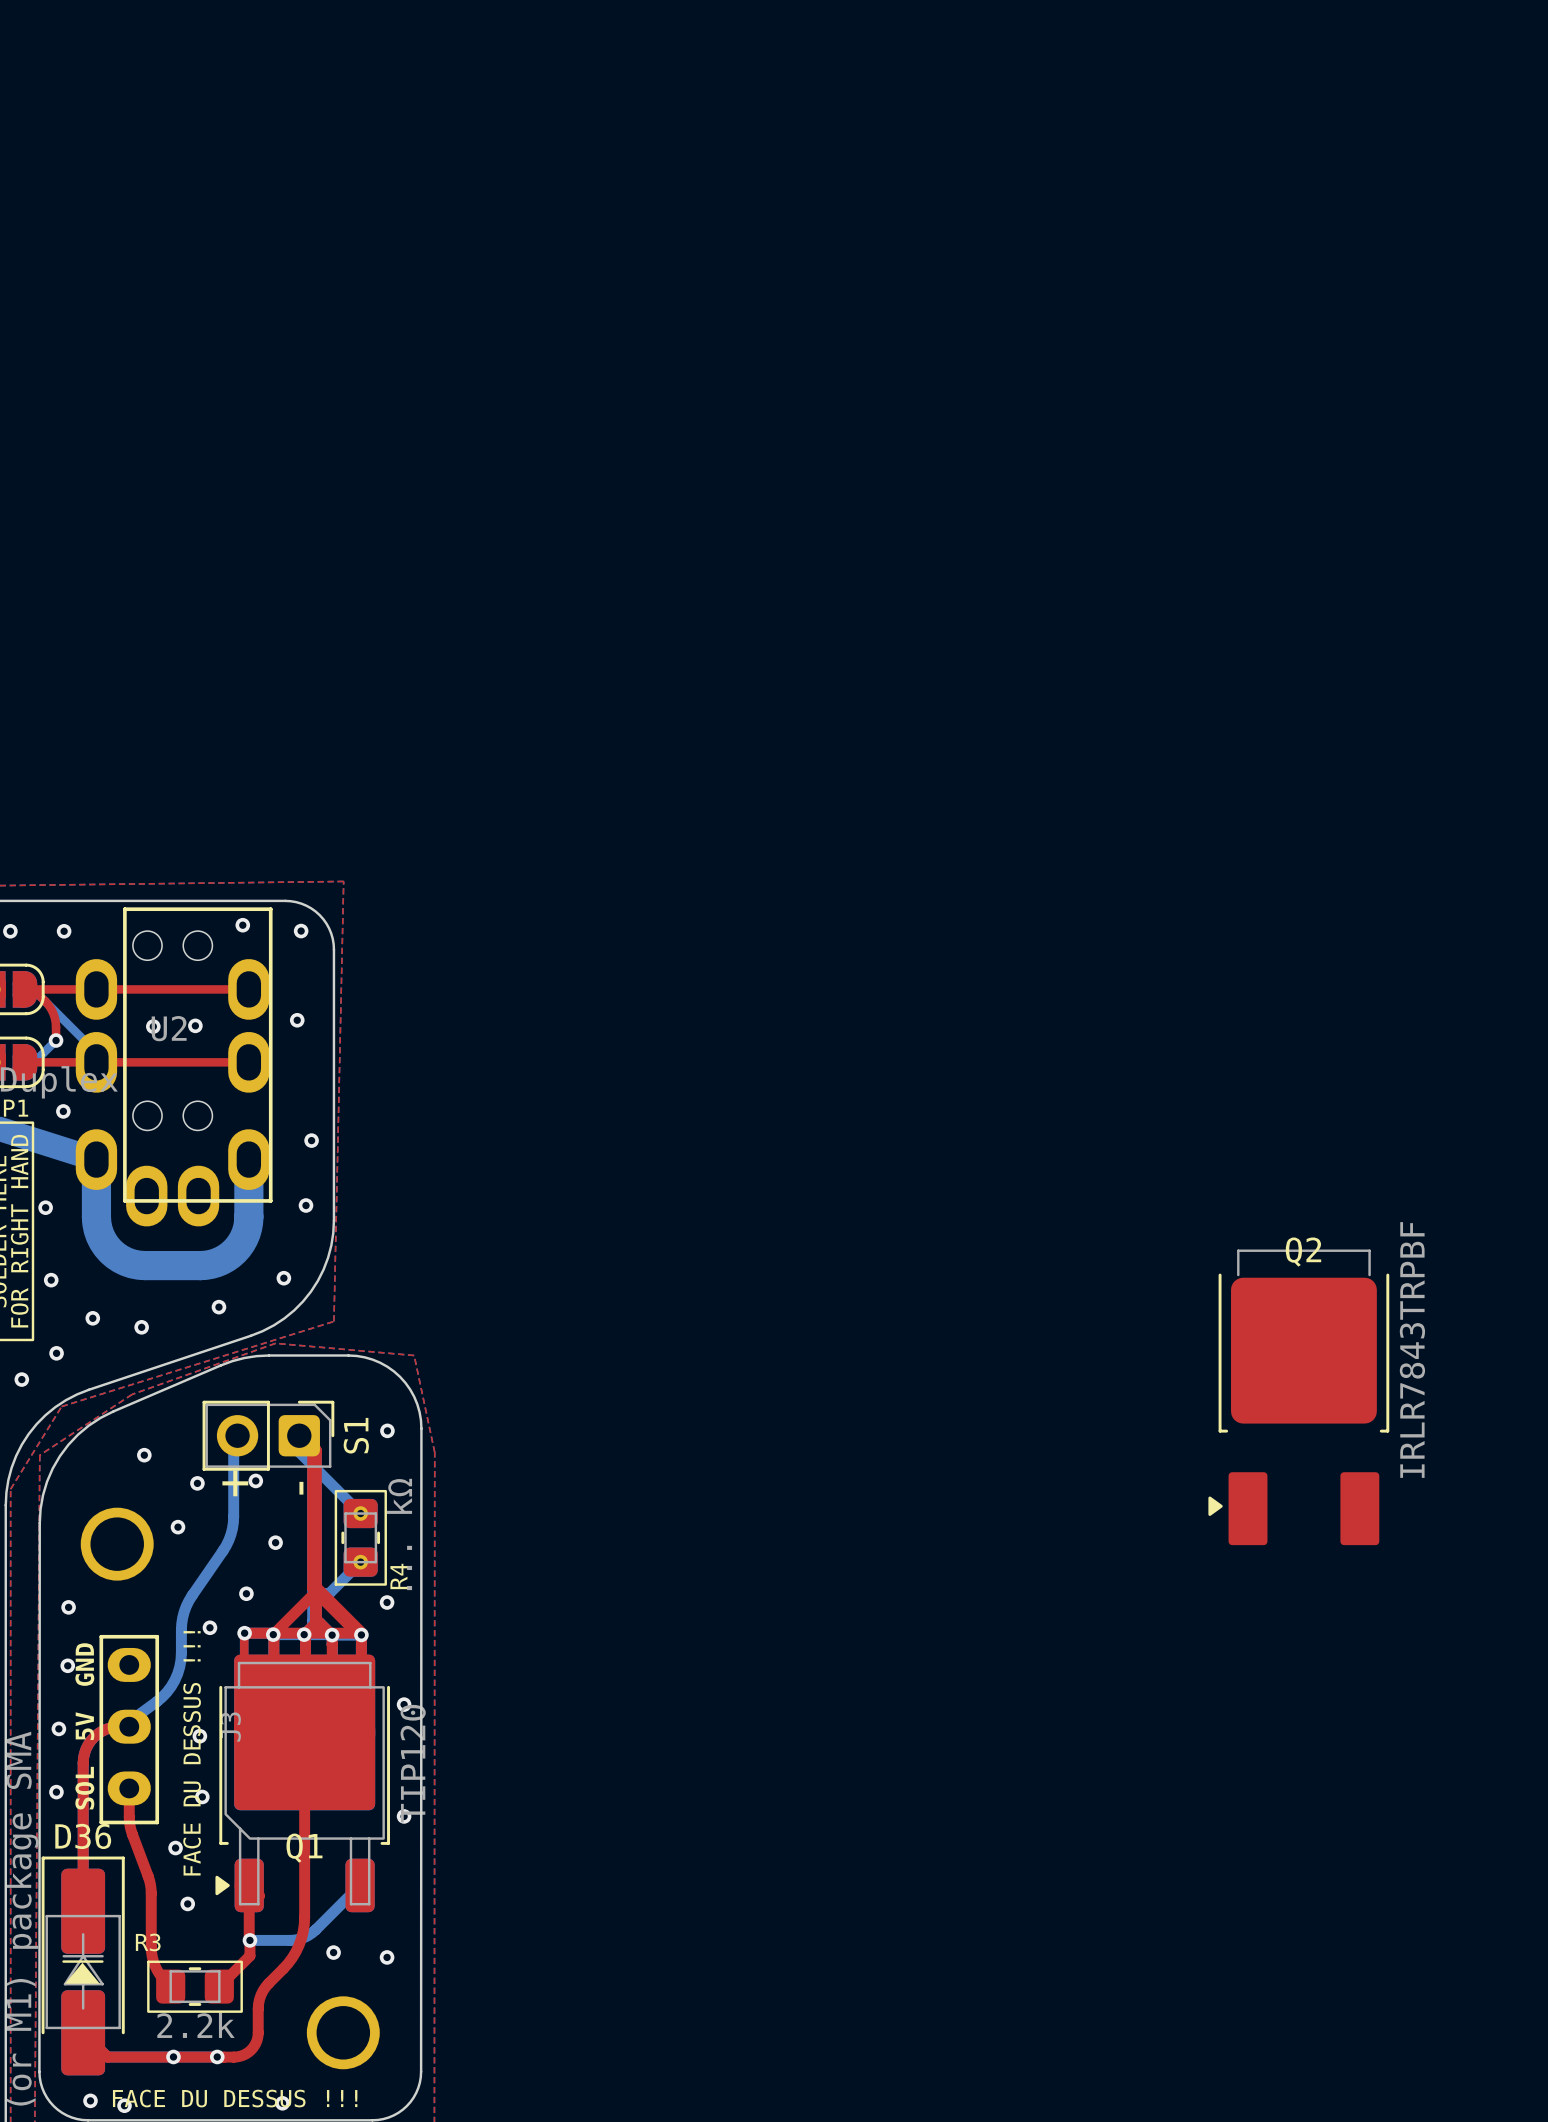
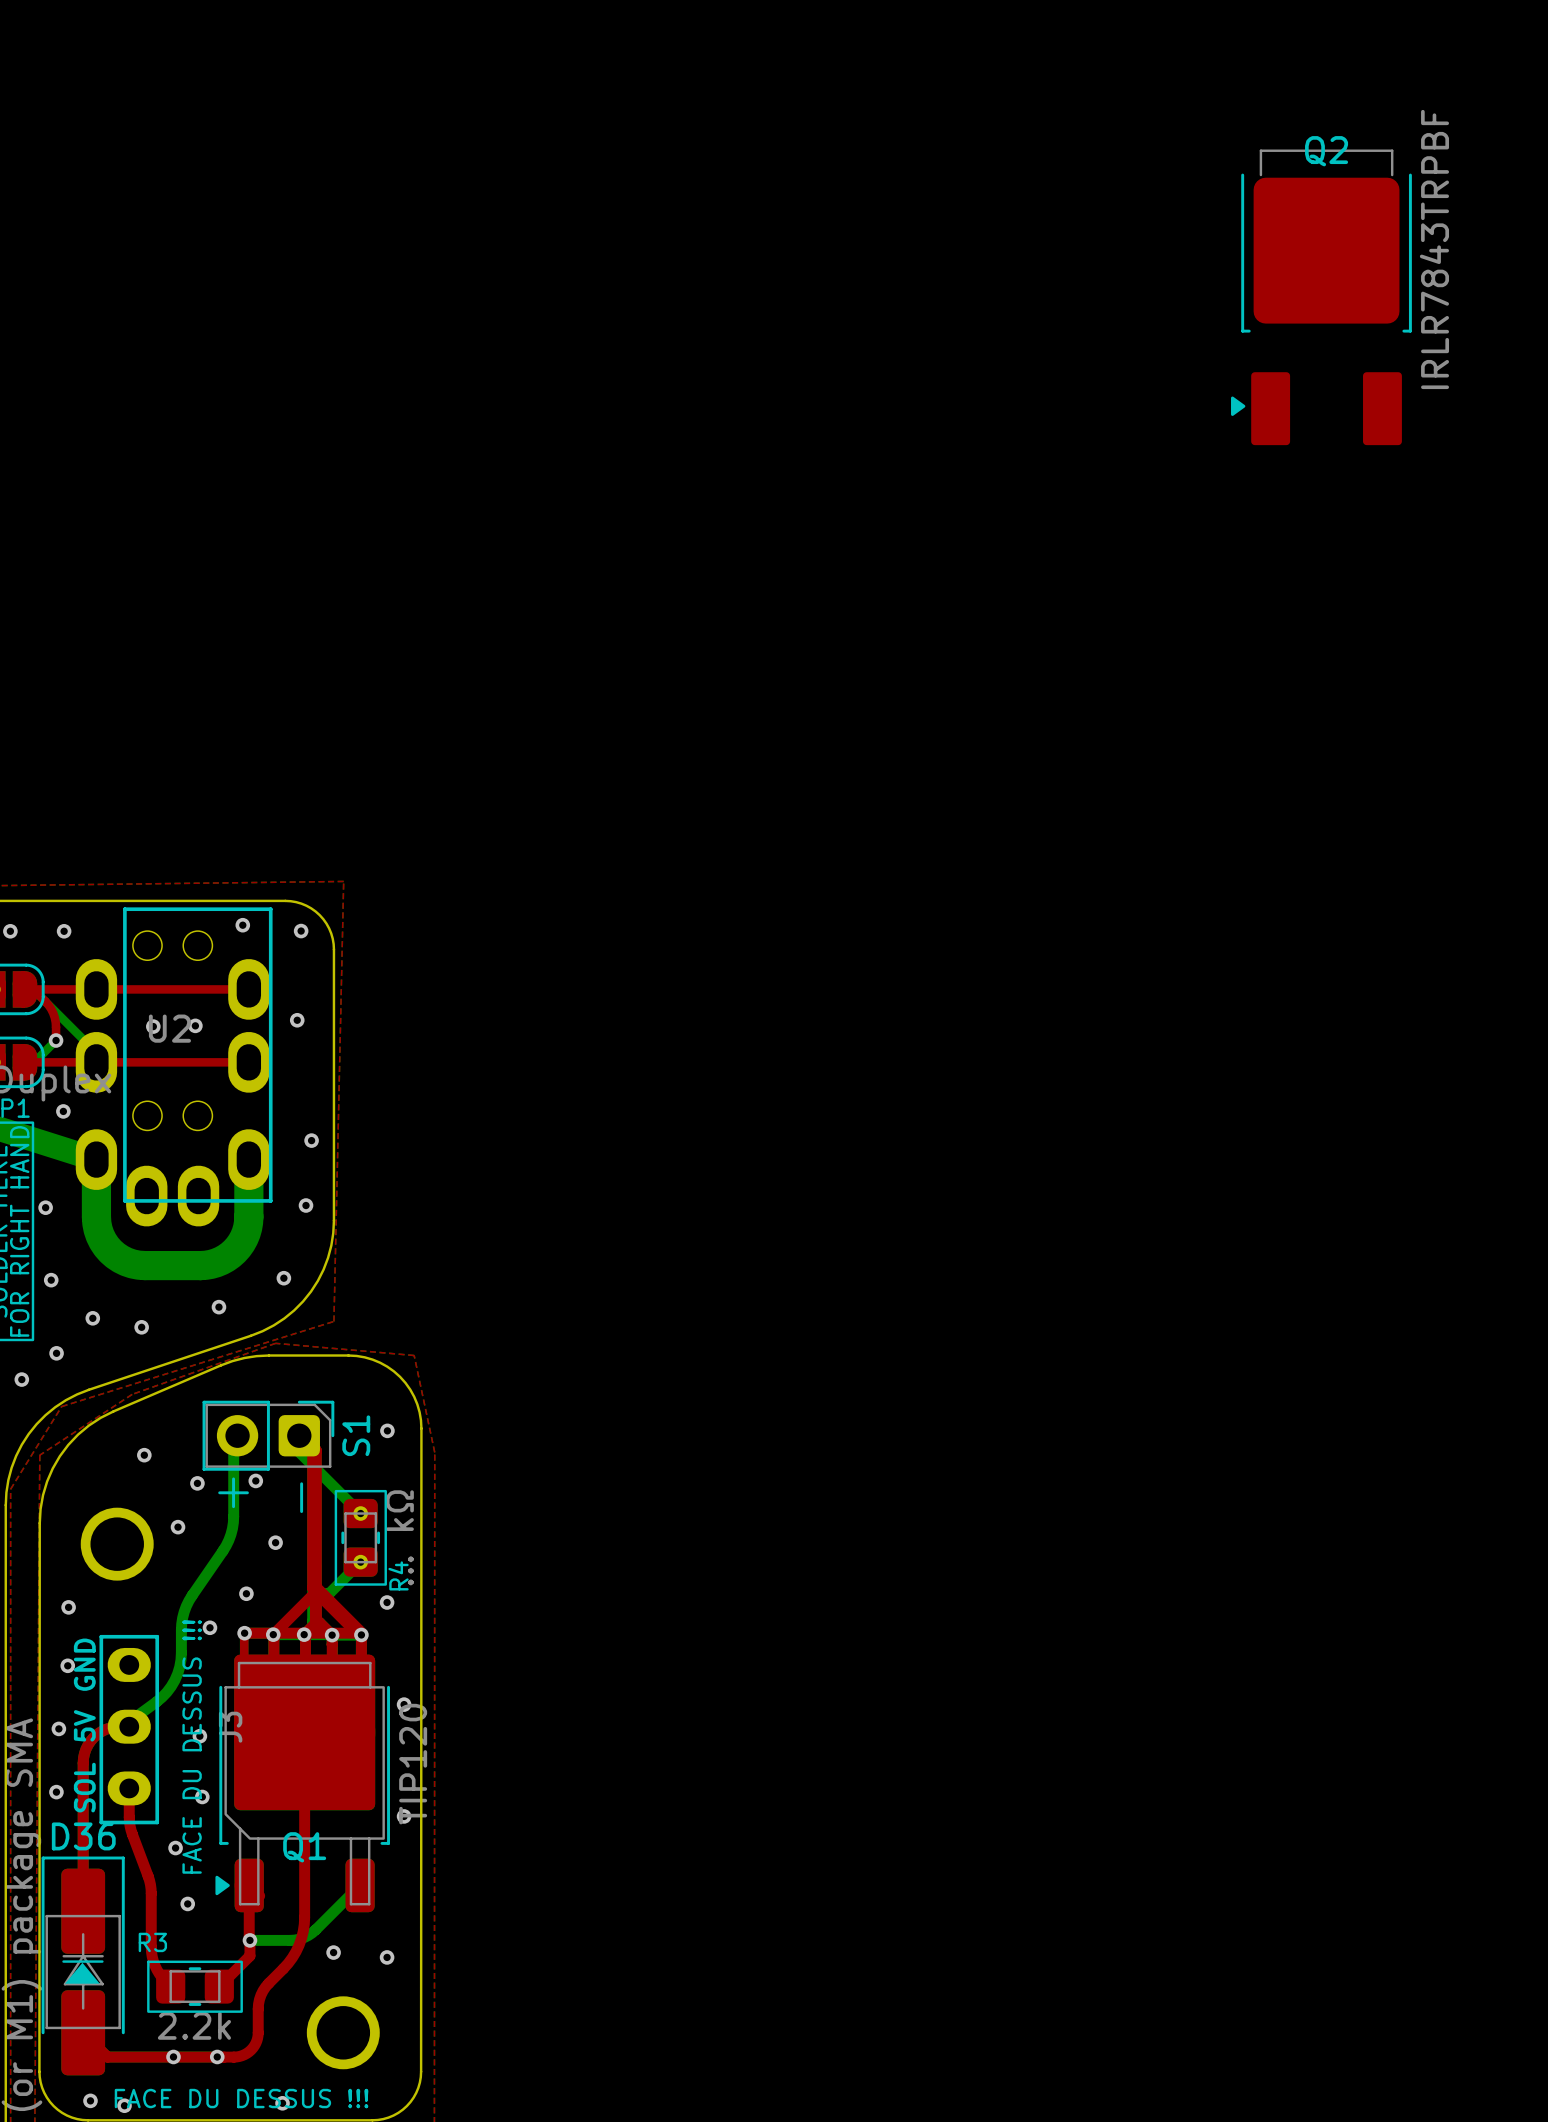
Q2 position: (1298, 1397) -> (1321, 297)

